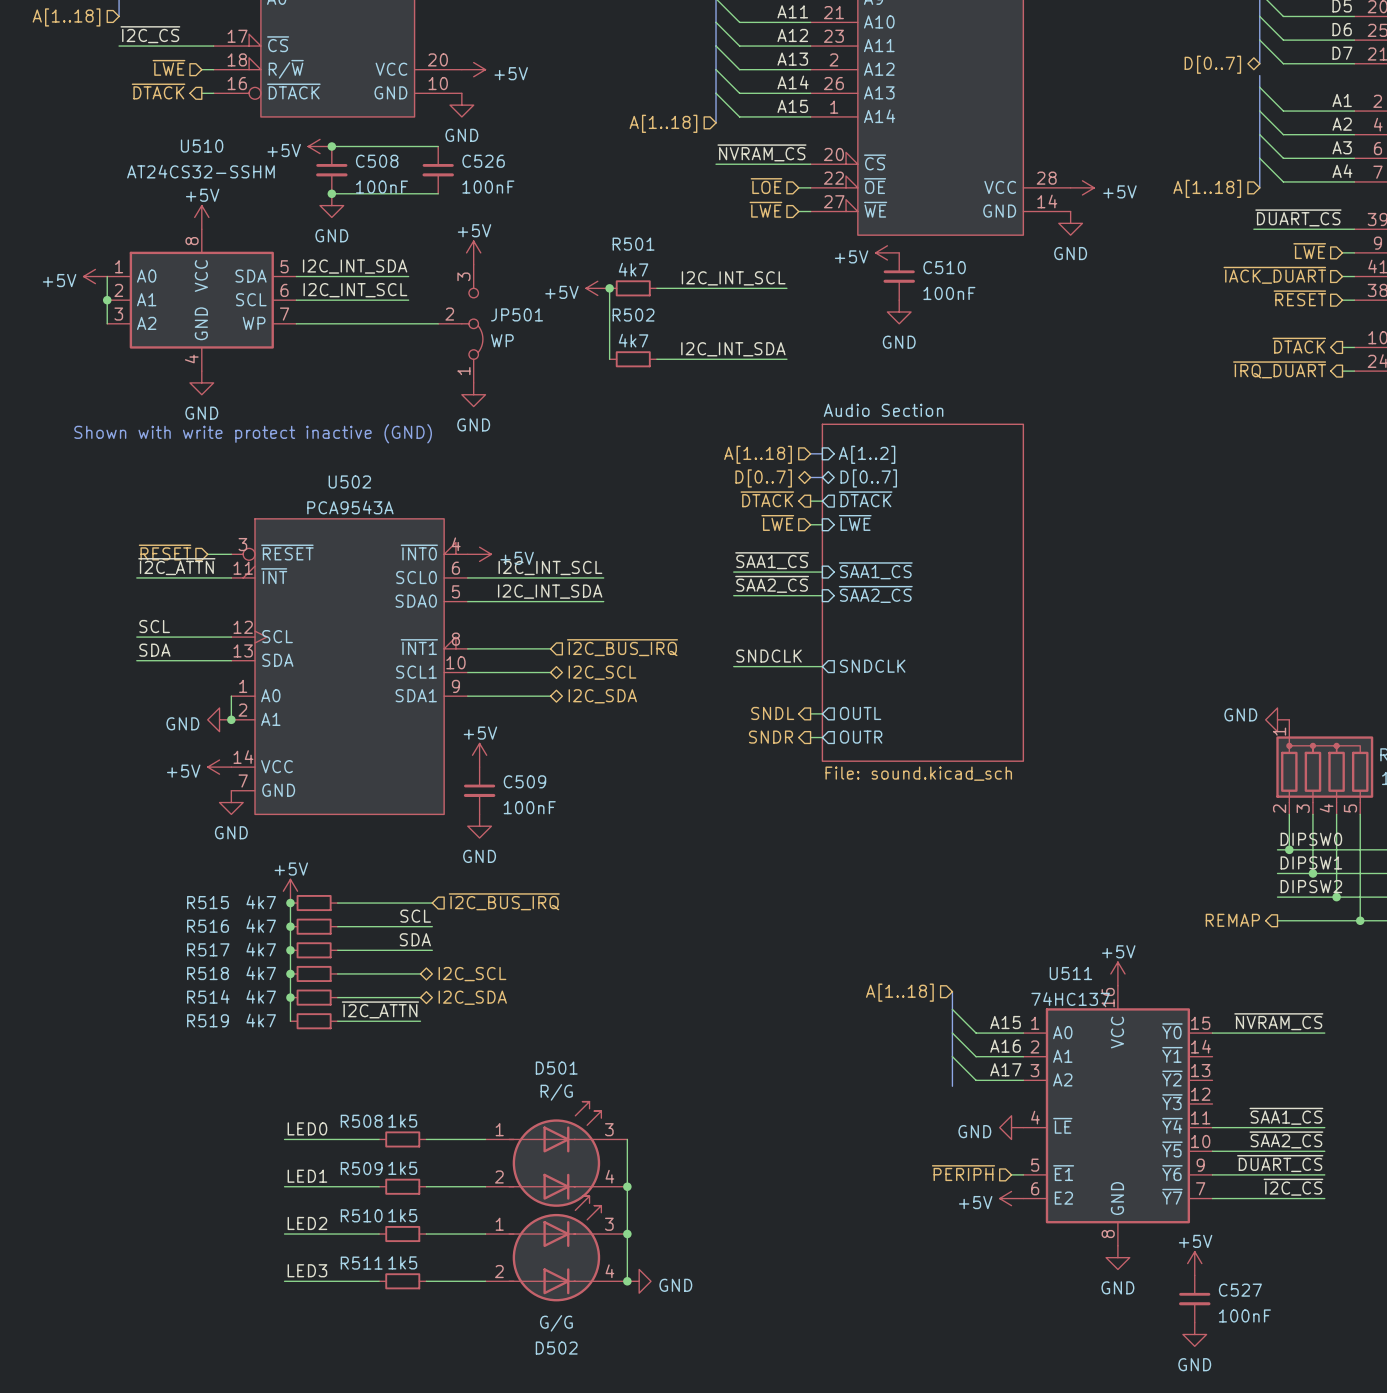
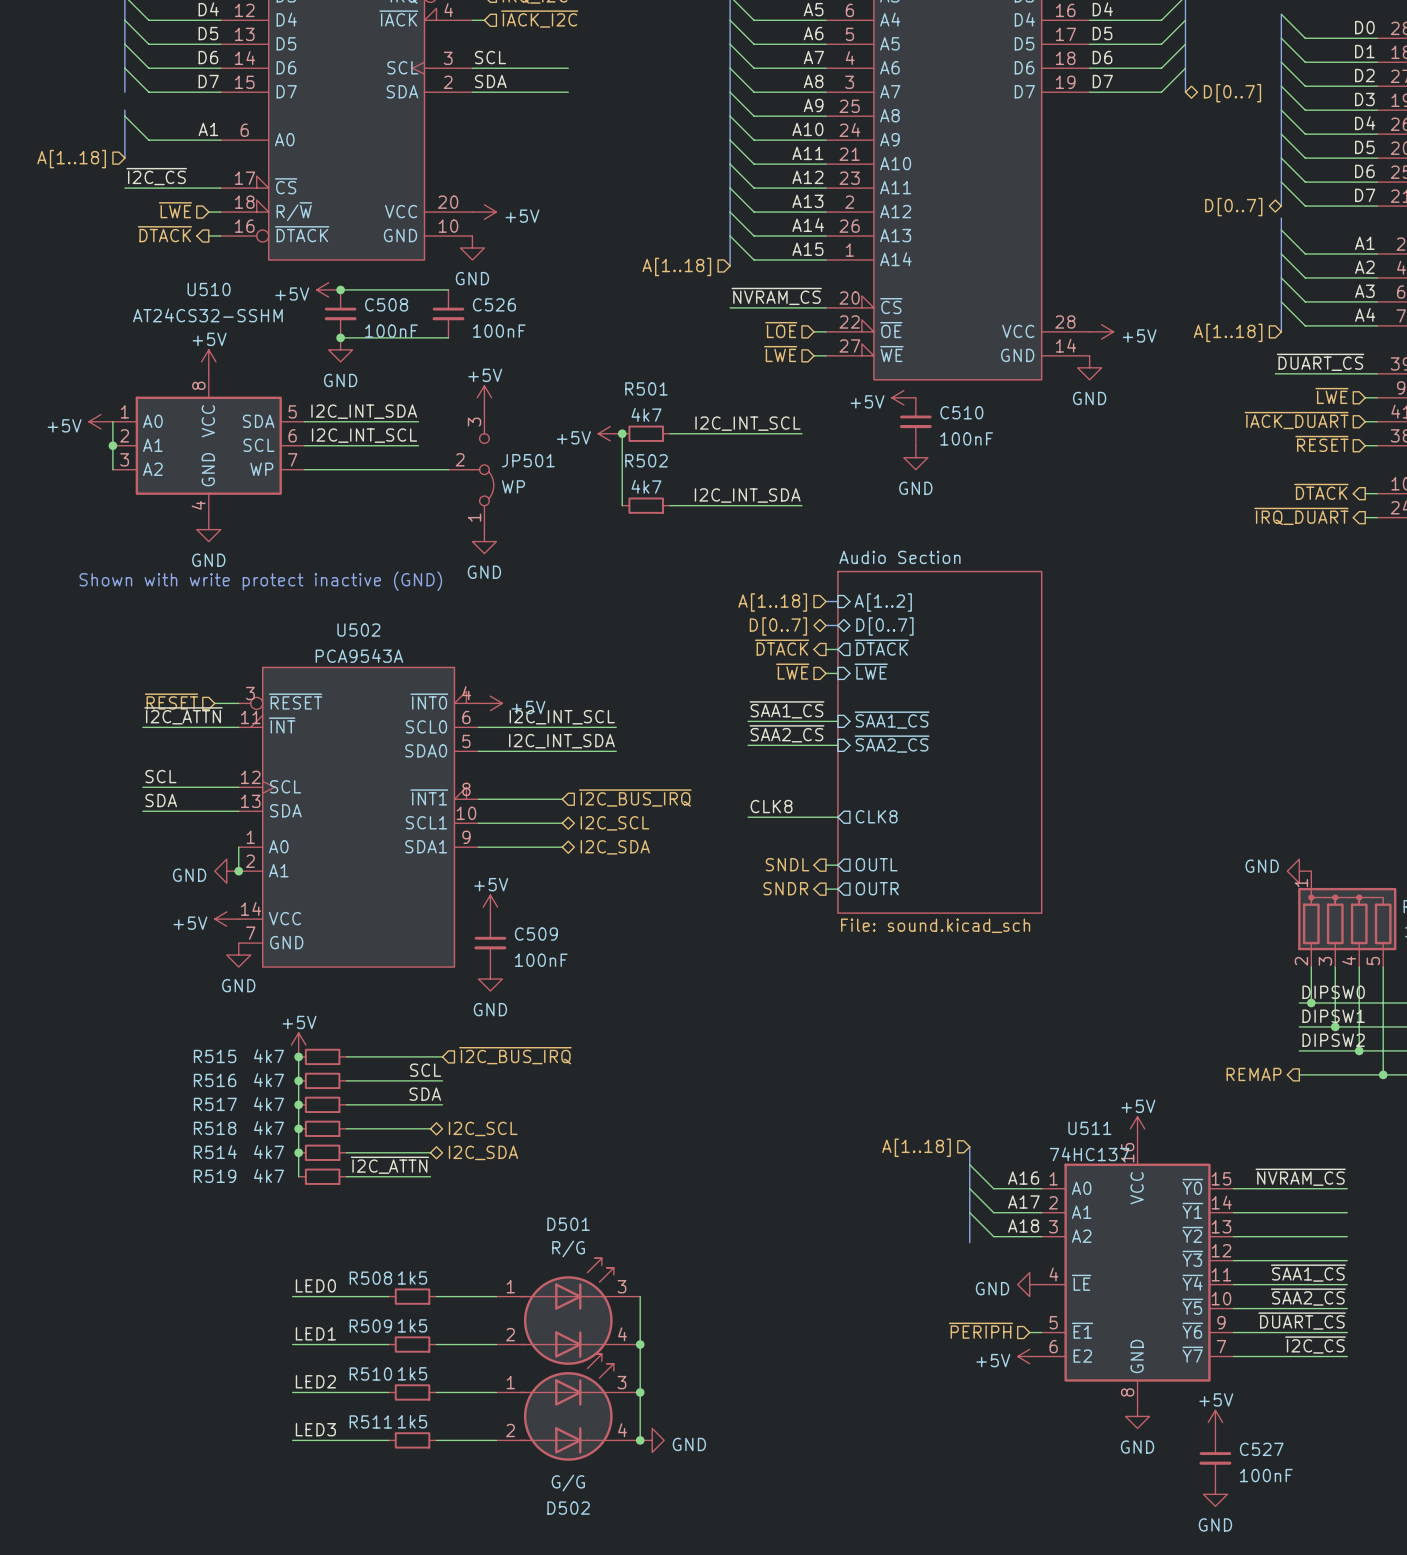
label: SNDCLK (769, 656) -> CLK8 (771, 806)
sheet pin: SNDCLK (872, 666) -> CLK8 (876, 816)
label: A15 (1005, 1022) -> A16 (1023, 1178)
label: A16 (1005, 1046) -> A17 (1023, 1202)
wire: none -> (1233, 1212) (1347, 1212)
label: A17 (1005, 1069) -> A18 (1023, 1225)
wire: none -> (1233, 1236) (1347, 1236)
wire: none -> (1233, 1260) (1347, 1260)

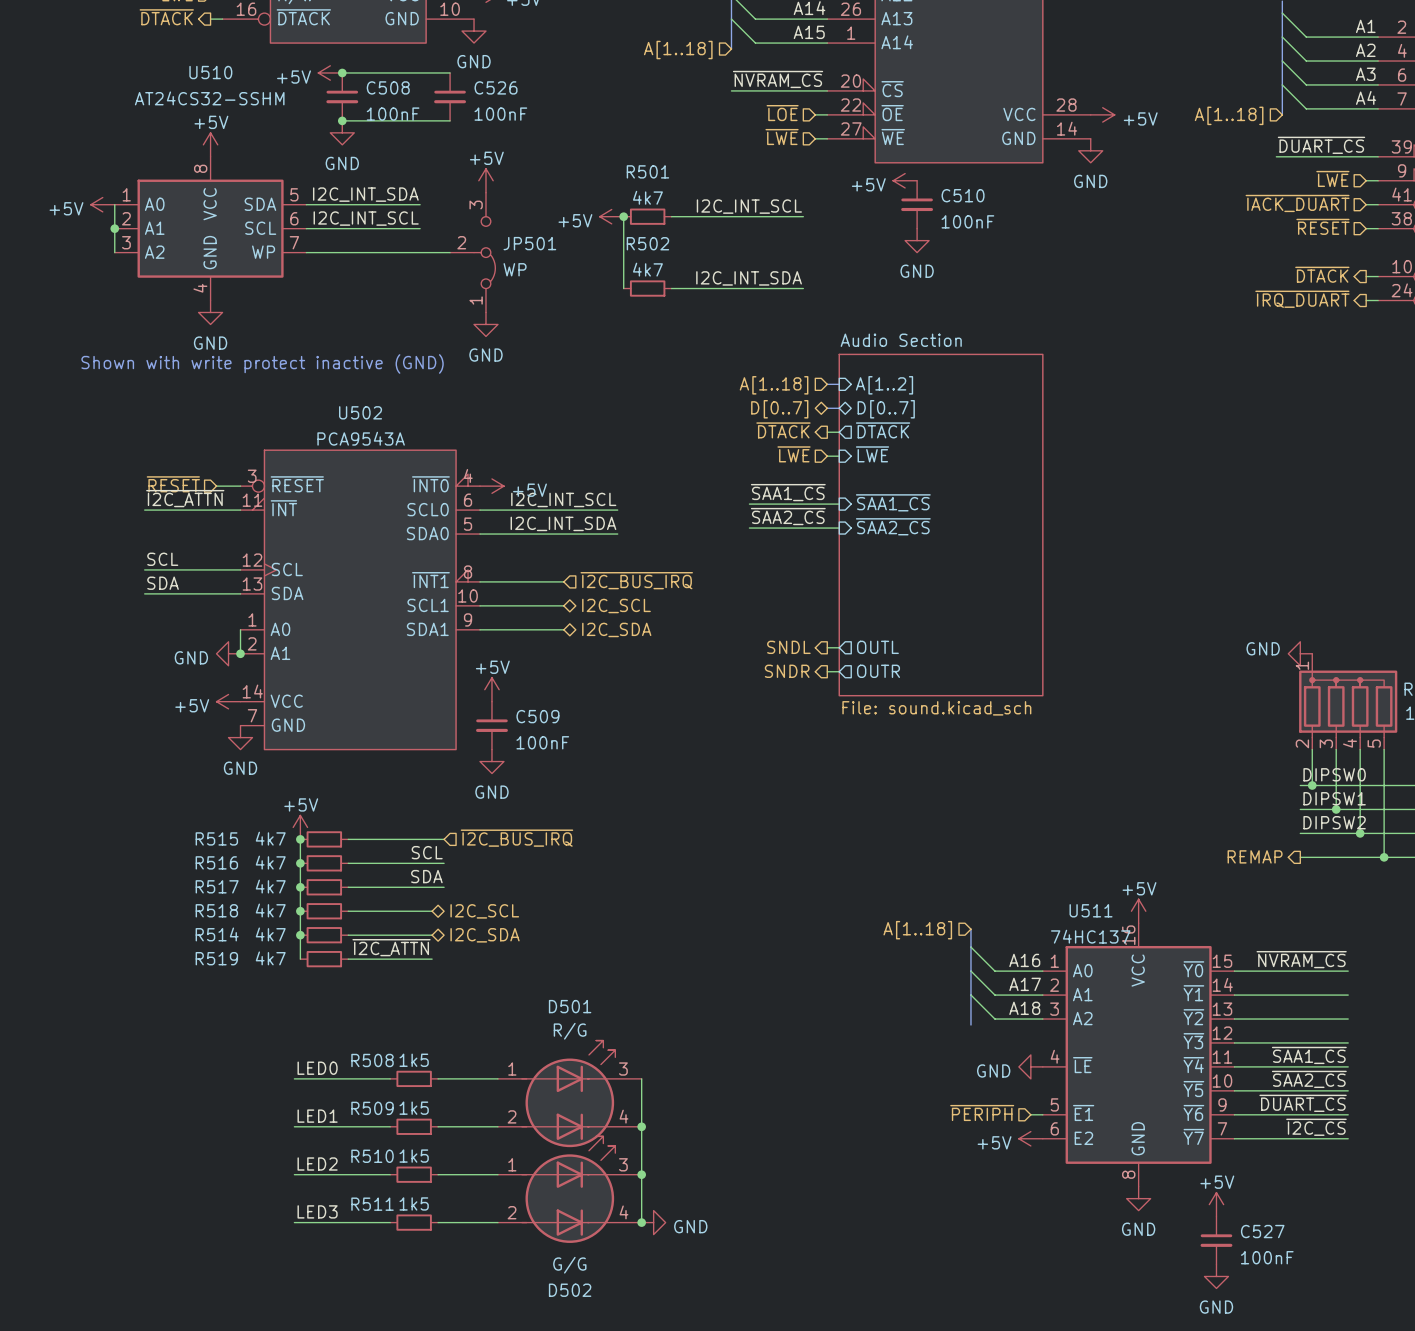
label: CLK8 (771, 806) -> none
sheet pin: CLK8 (876, 816) -> none
wire: (748, 817) (837, 817) -> none

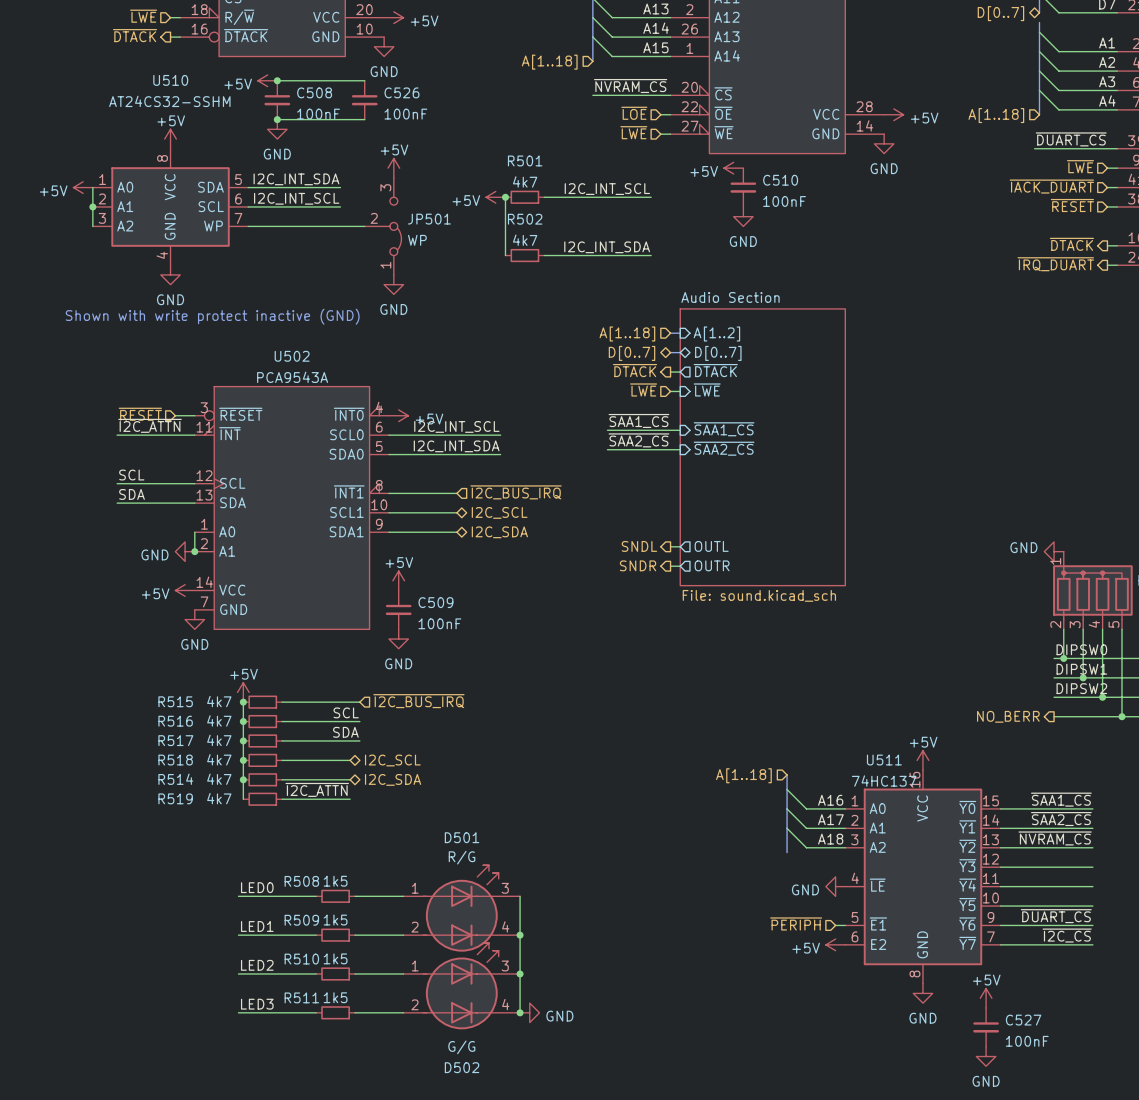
hierarchical label: REMAP (1255, 856) -> NO_BERR (1008, 716)
label: ~{NVRAM_CS} (1301, 959) -> ~{SAA1_CS} (1061, 799)
label: none -> ~{NVRAM_CS} (1055, 838)
label: ~{SAA1_CS} (1309, 1055) -> none
label position: ~{SAA2_CS} (1309, 1079) -> ~{SAA2_CS} (1061, 819)

